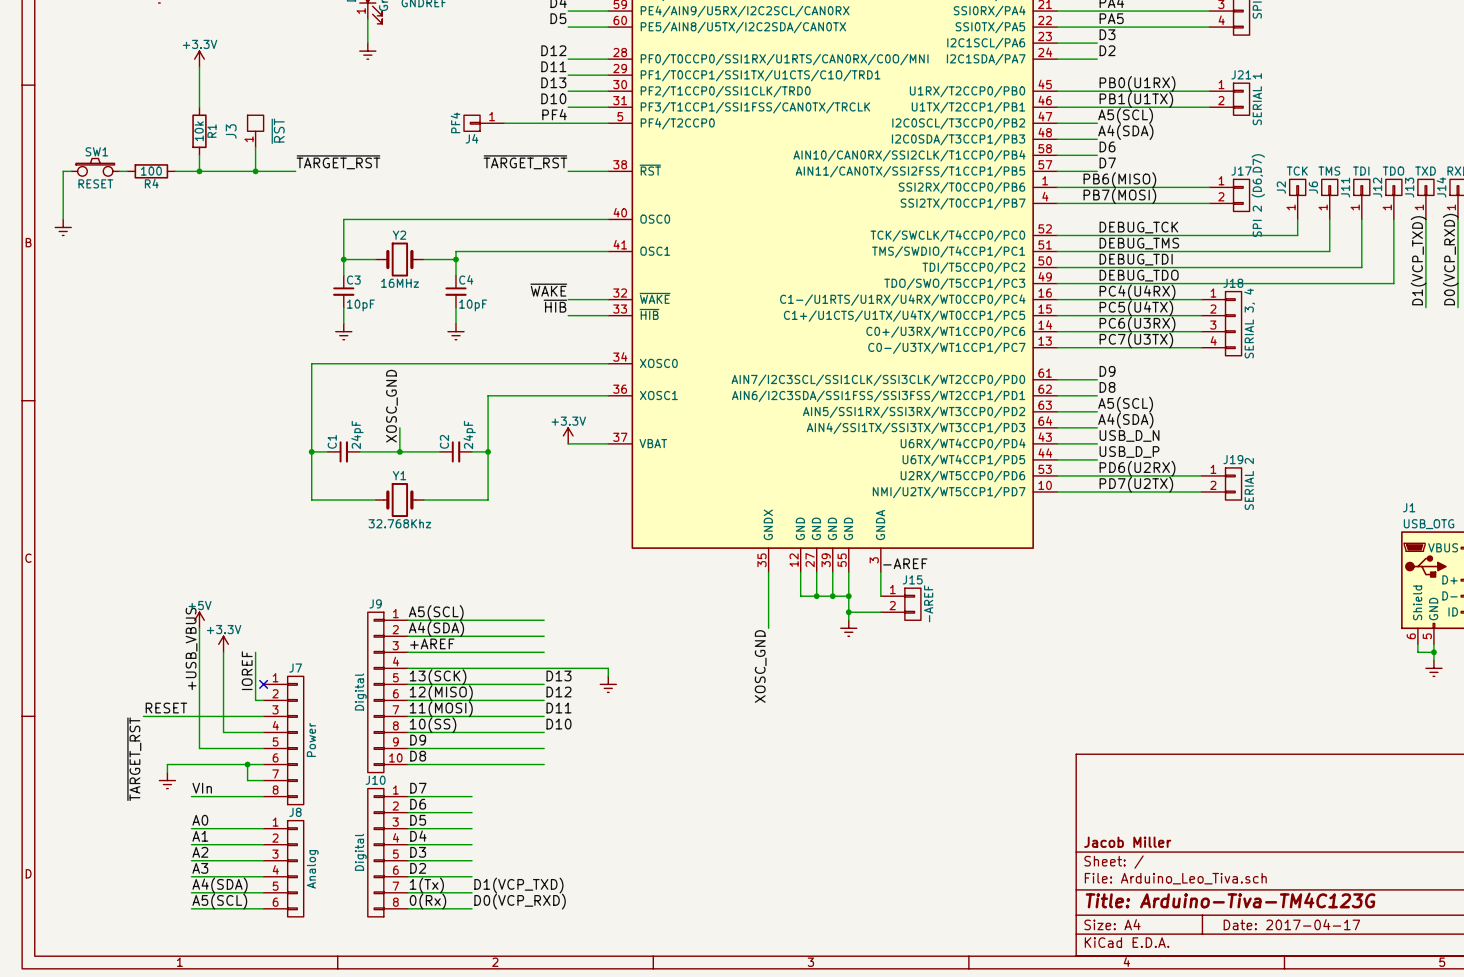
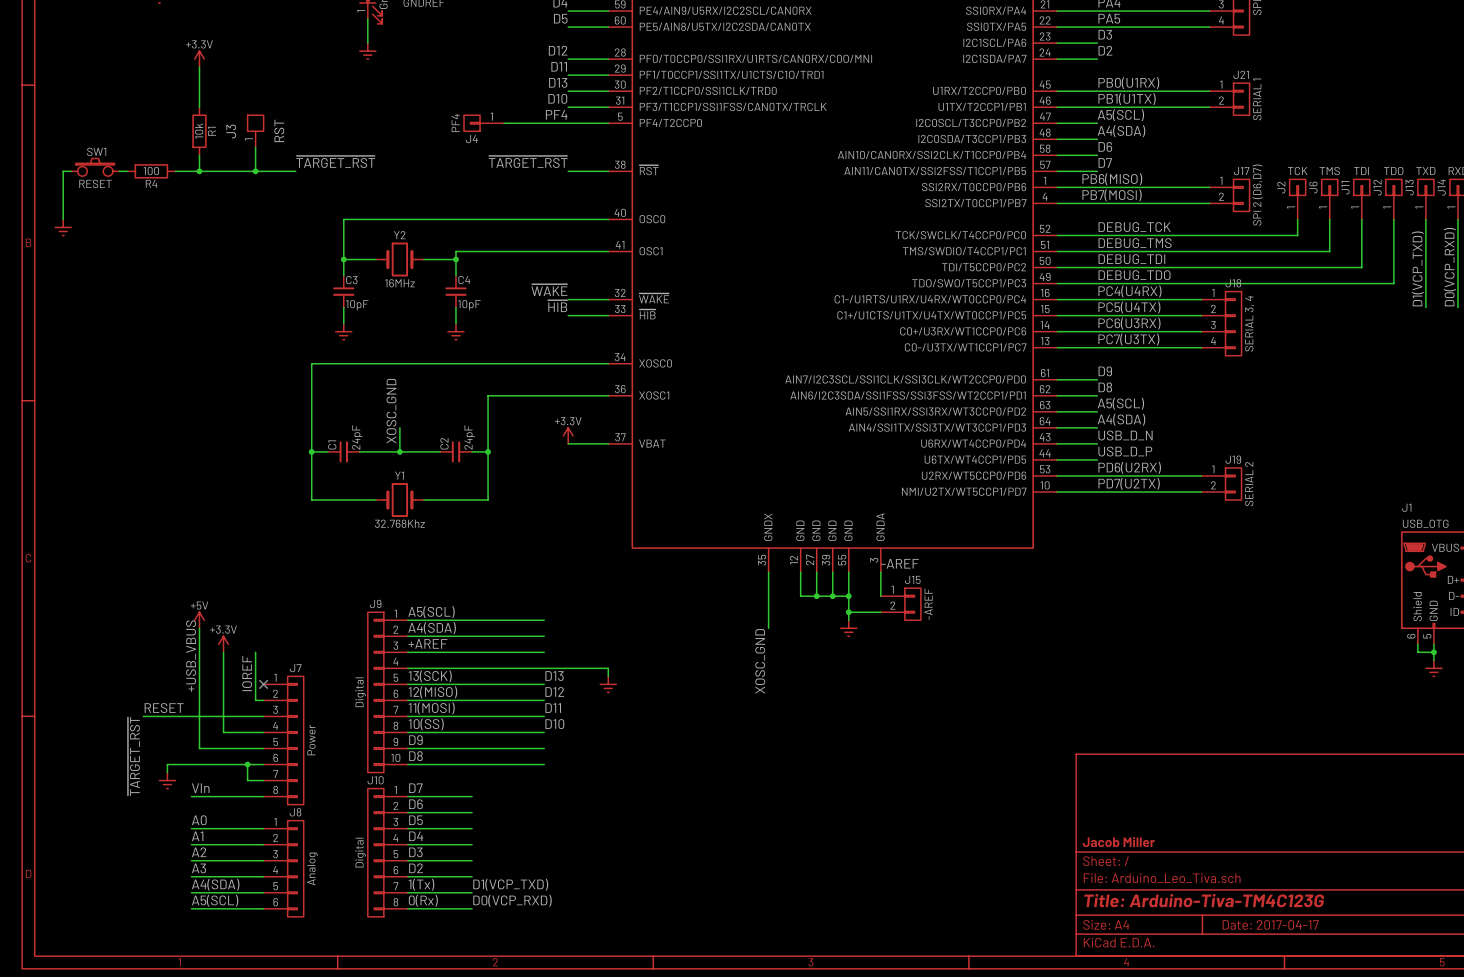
J3 value: ~{RST} (278, 131) -> RST (279, 130)

